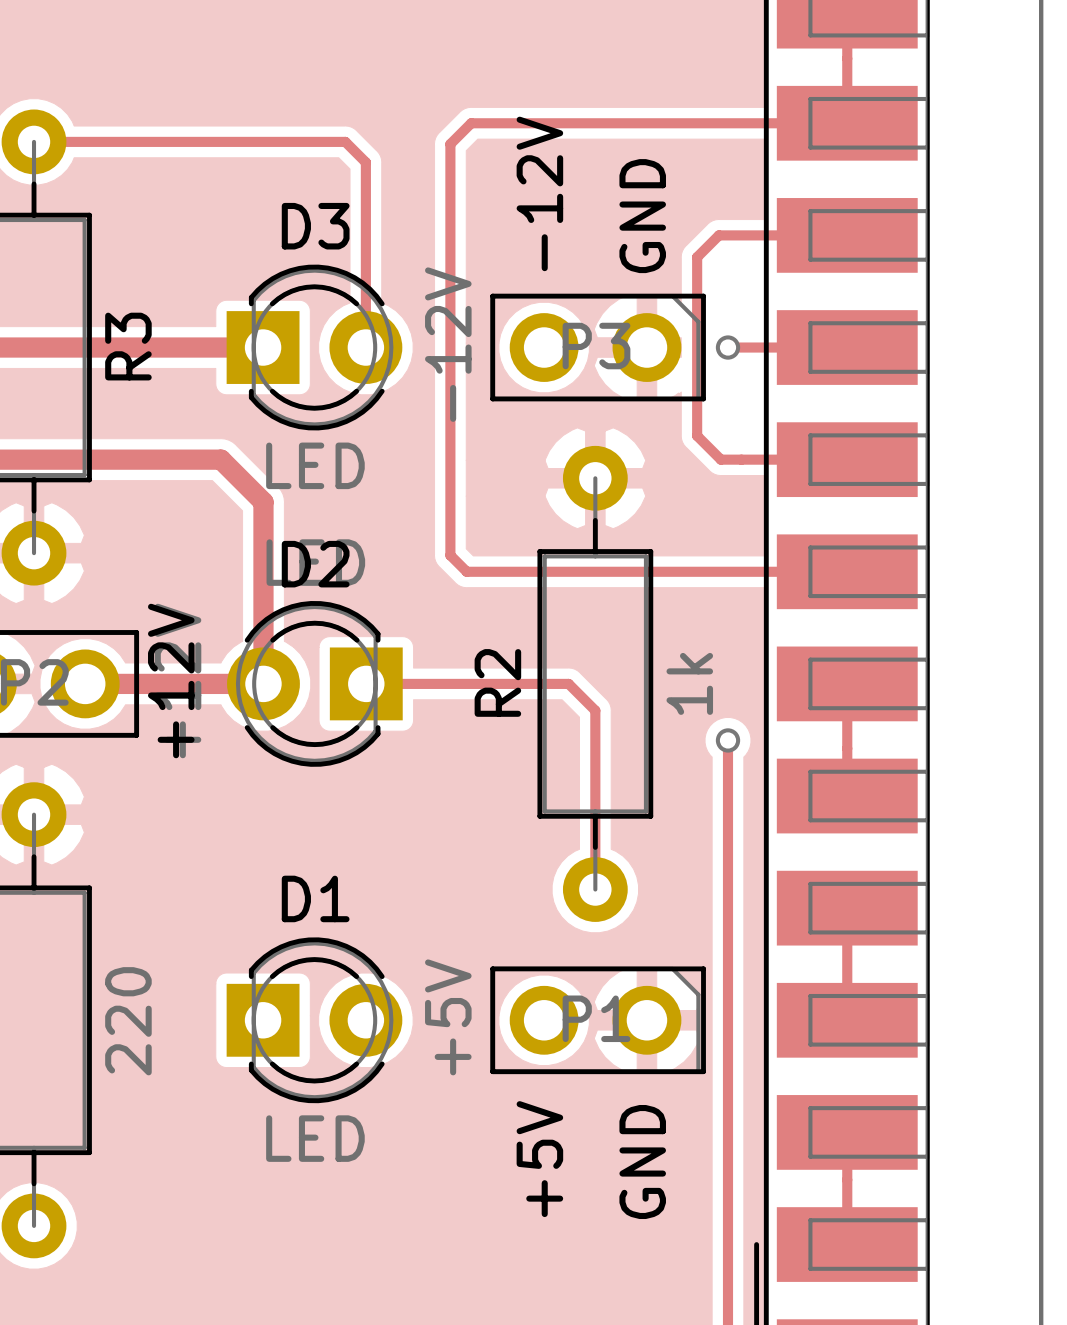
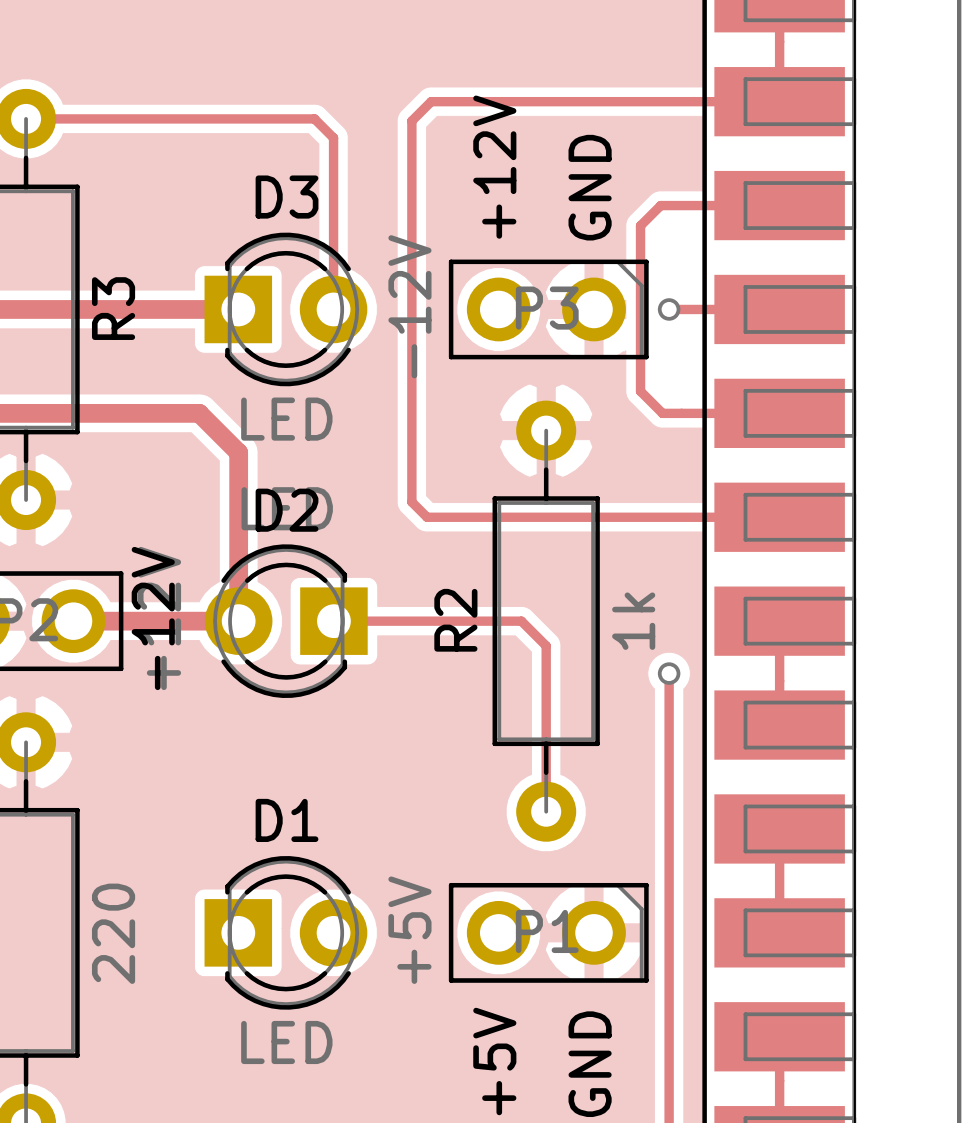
text: -12V (539, 193) -> +12V (494, 167)
text: +12V (171, 681) -> -12V (153, 618)

